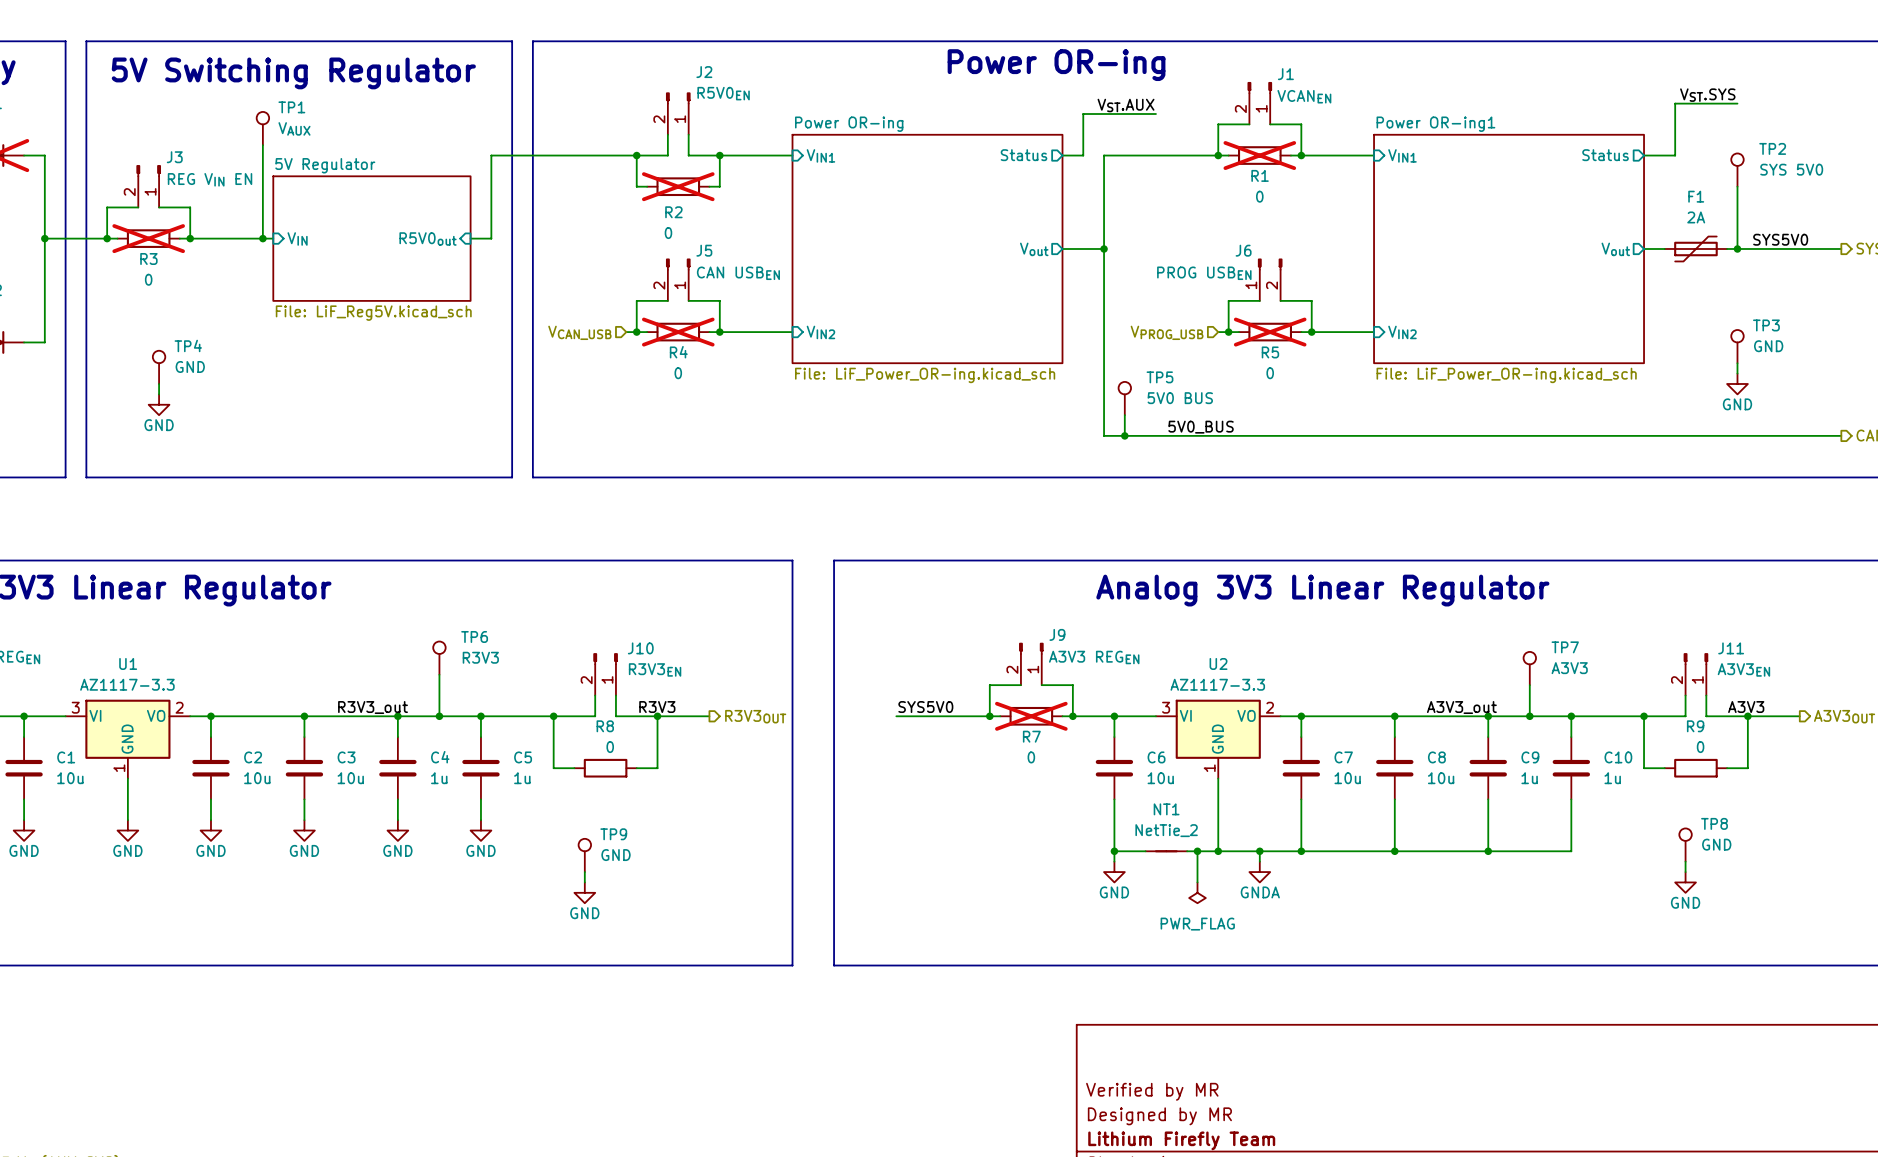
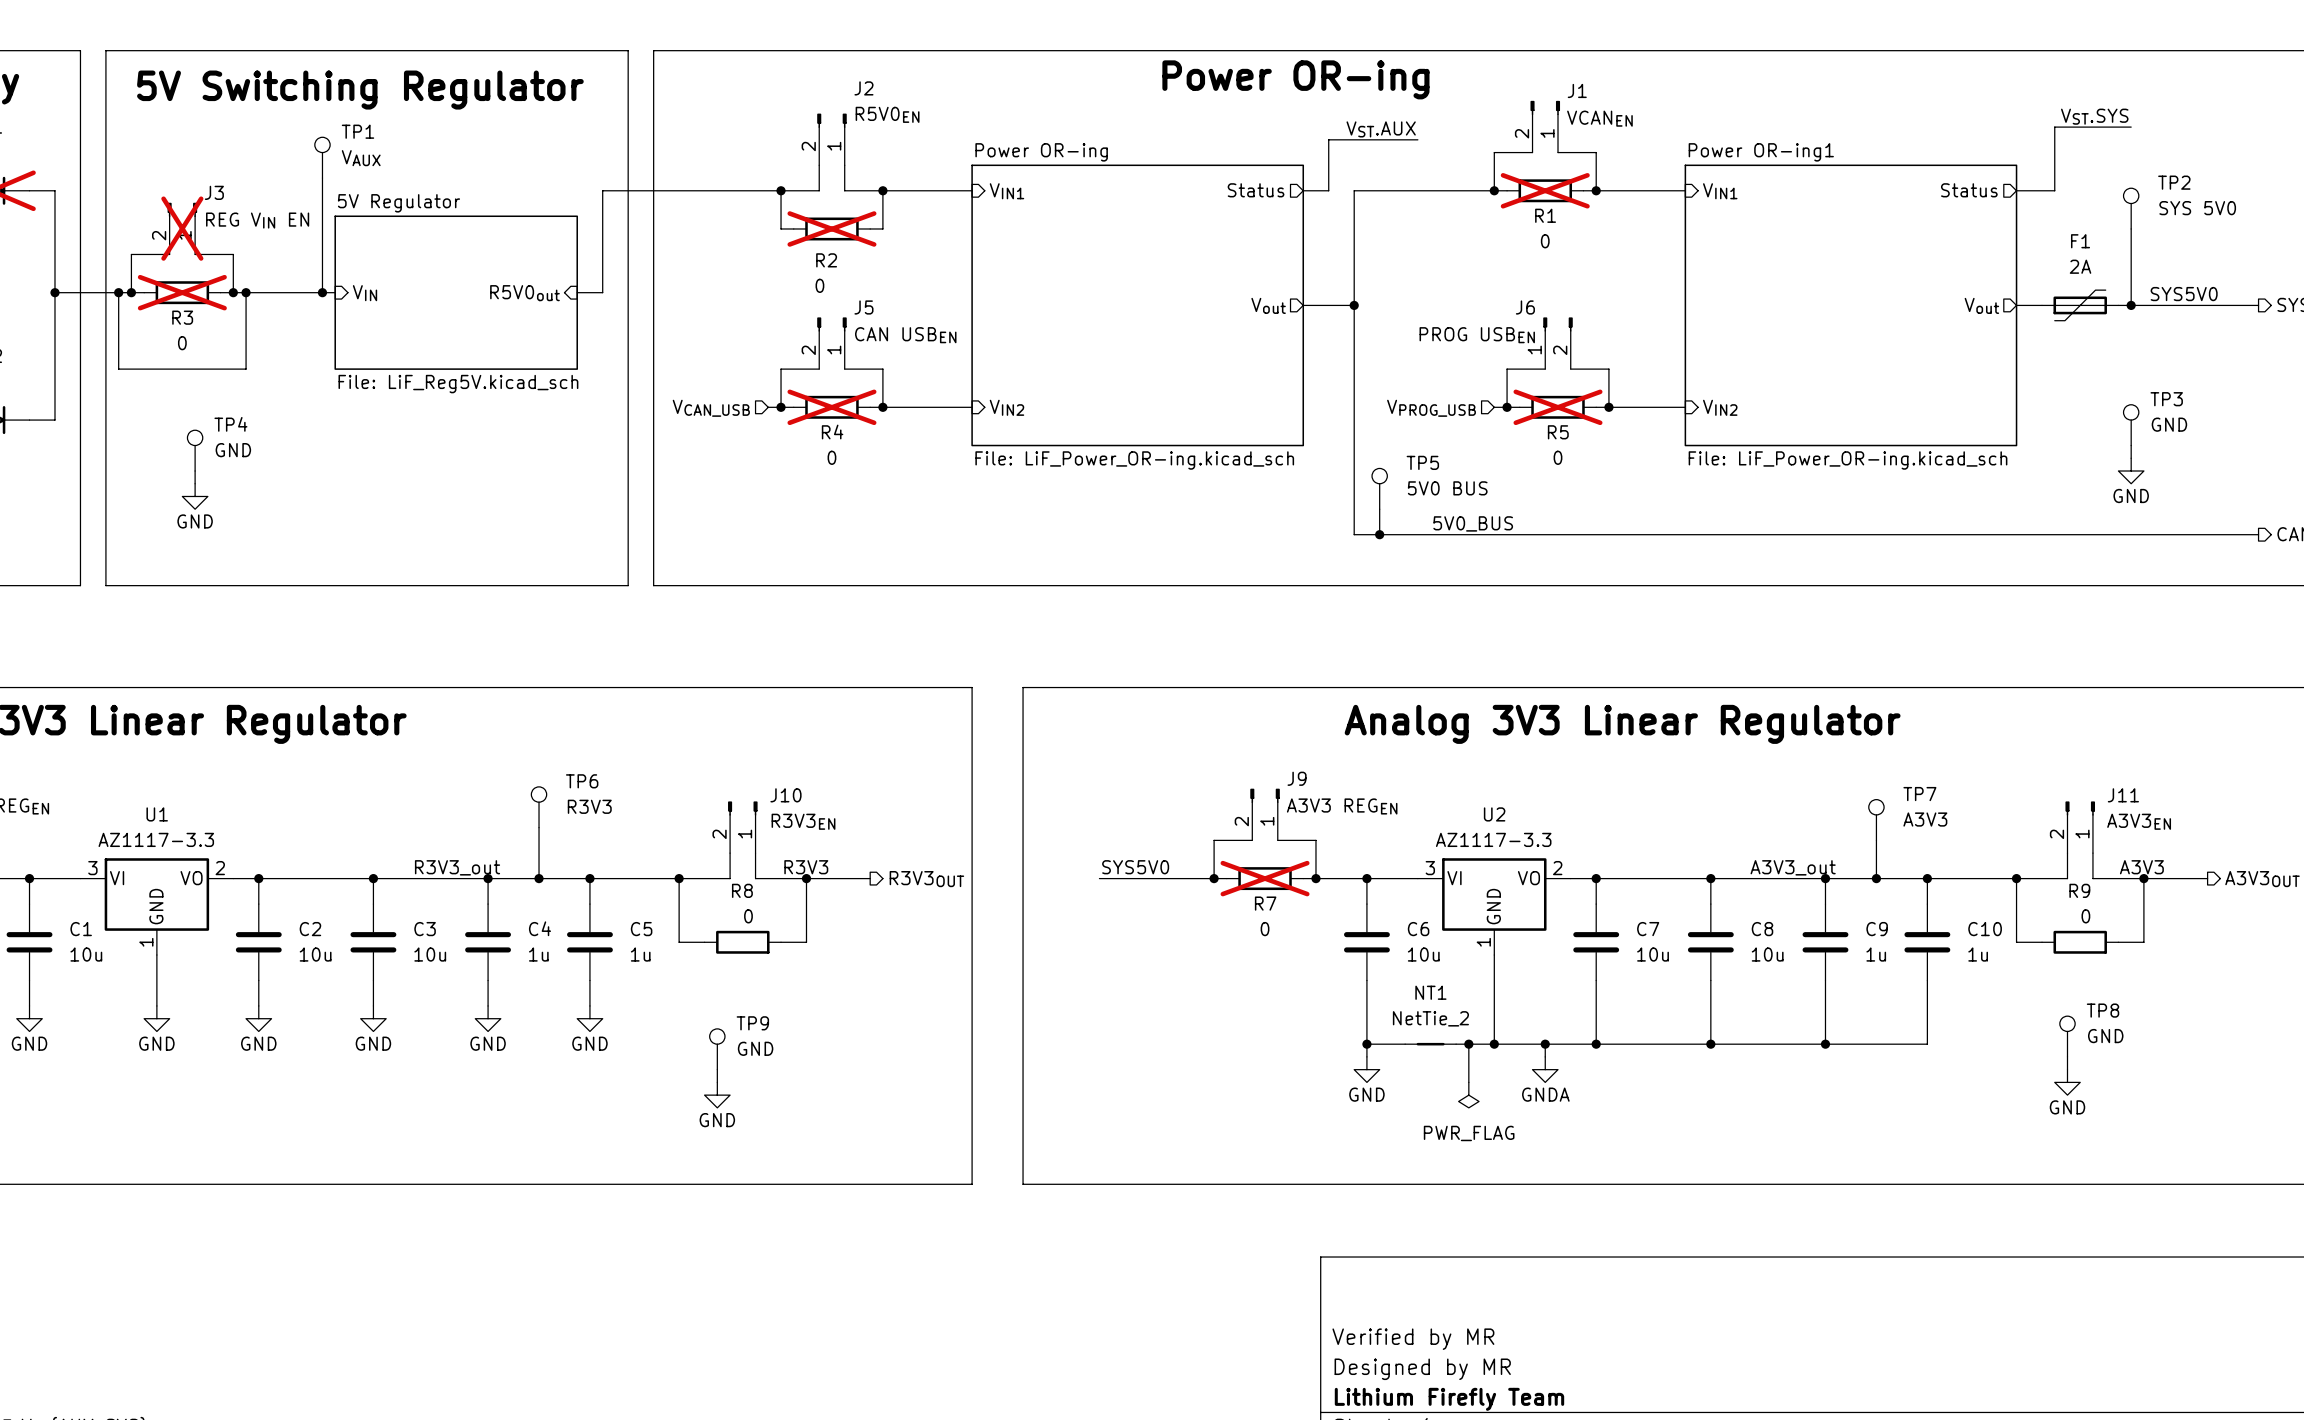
J3 do-not-place cross: none -> (182, 228)
wire: none -> (118, 292) (118, 369) (246, 369) (246, 292)
junction: none -> (118, 292)
junction: none -> (246, 292)

